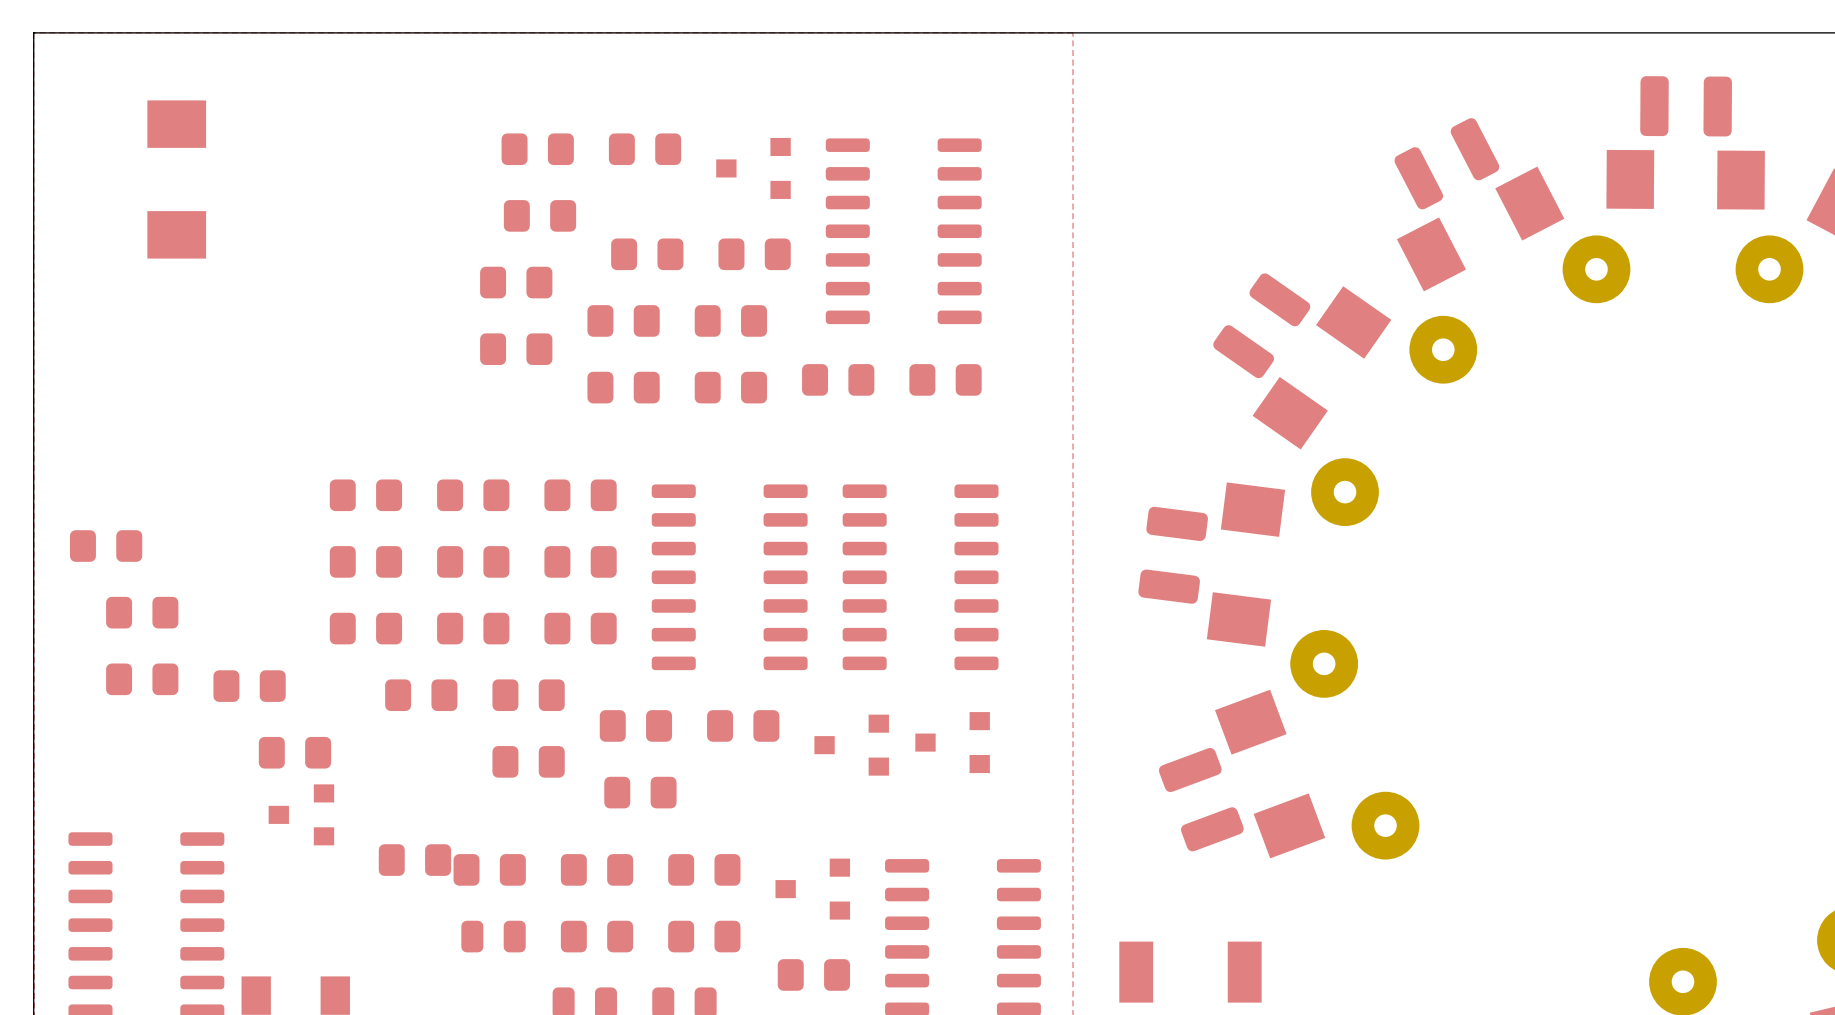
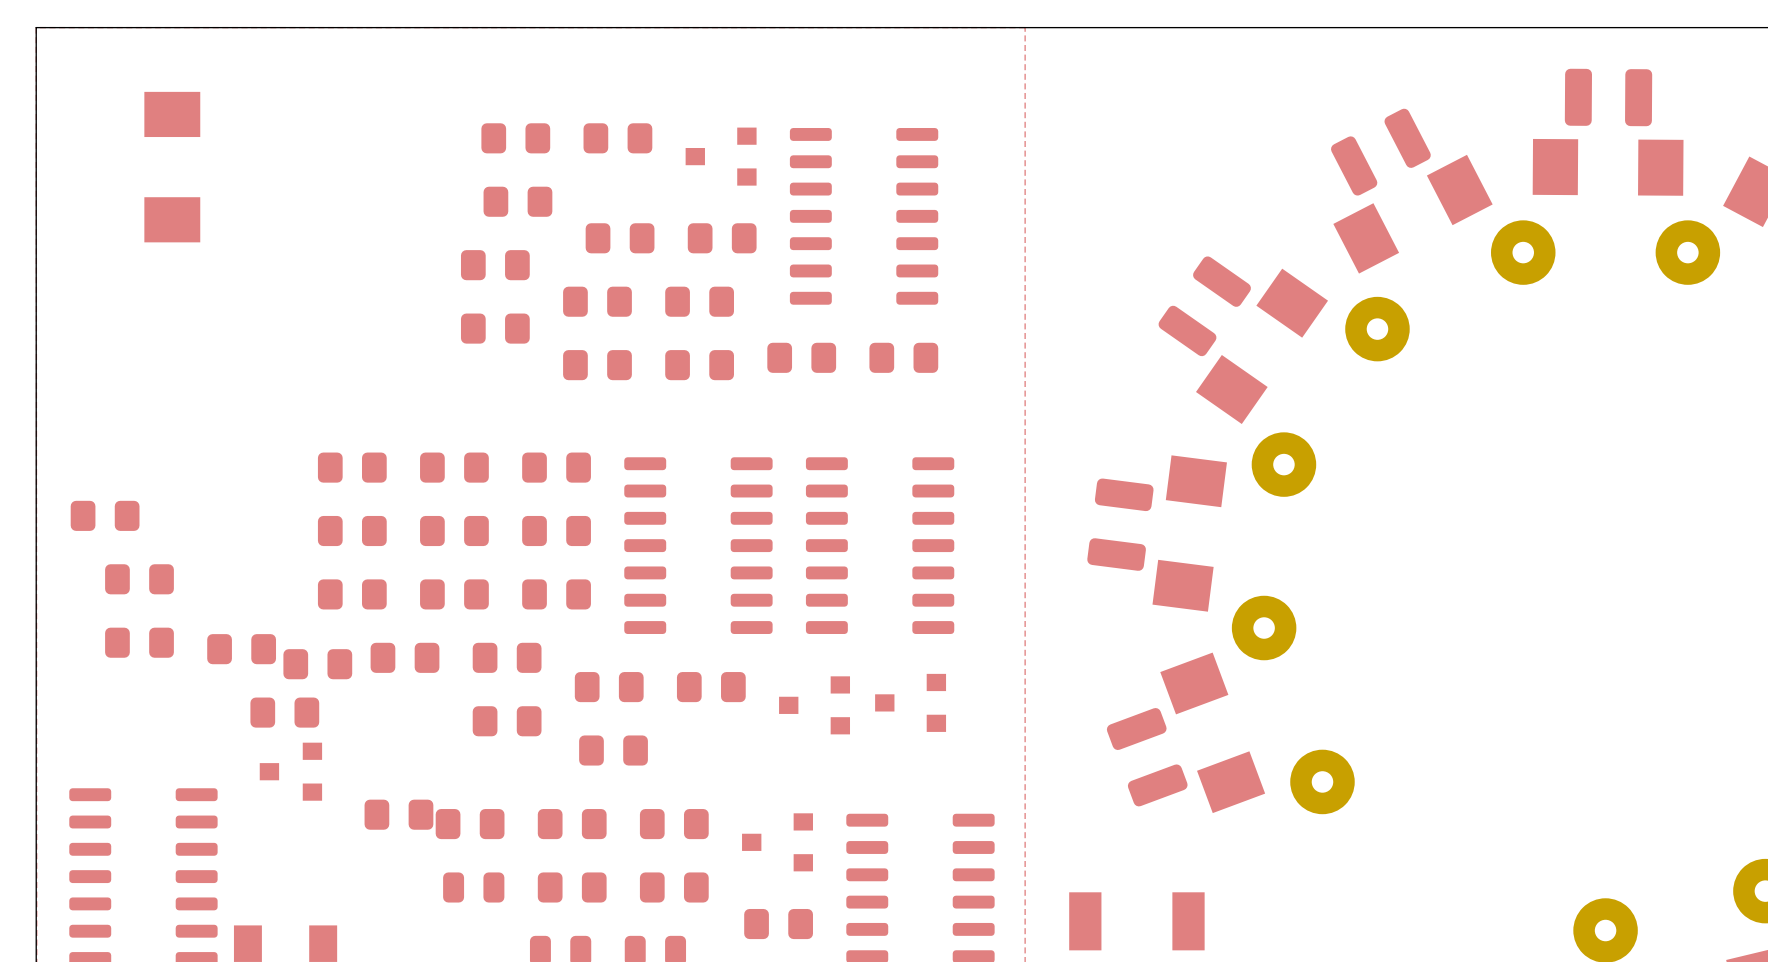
part: none -> (317, 664)

